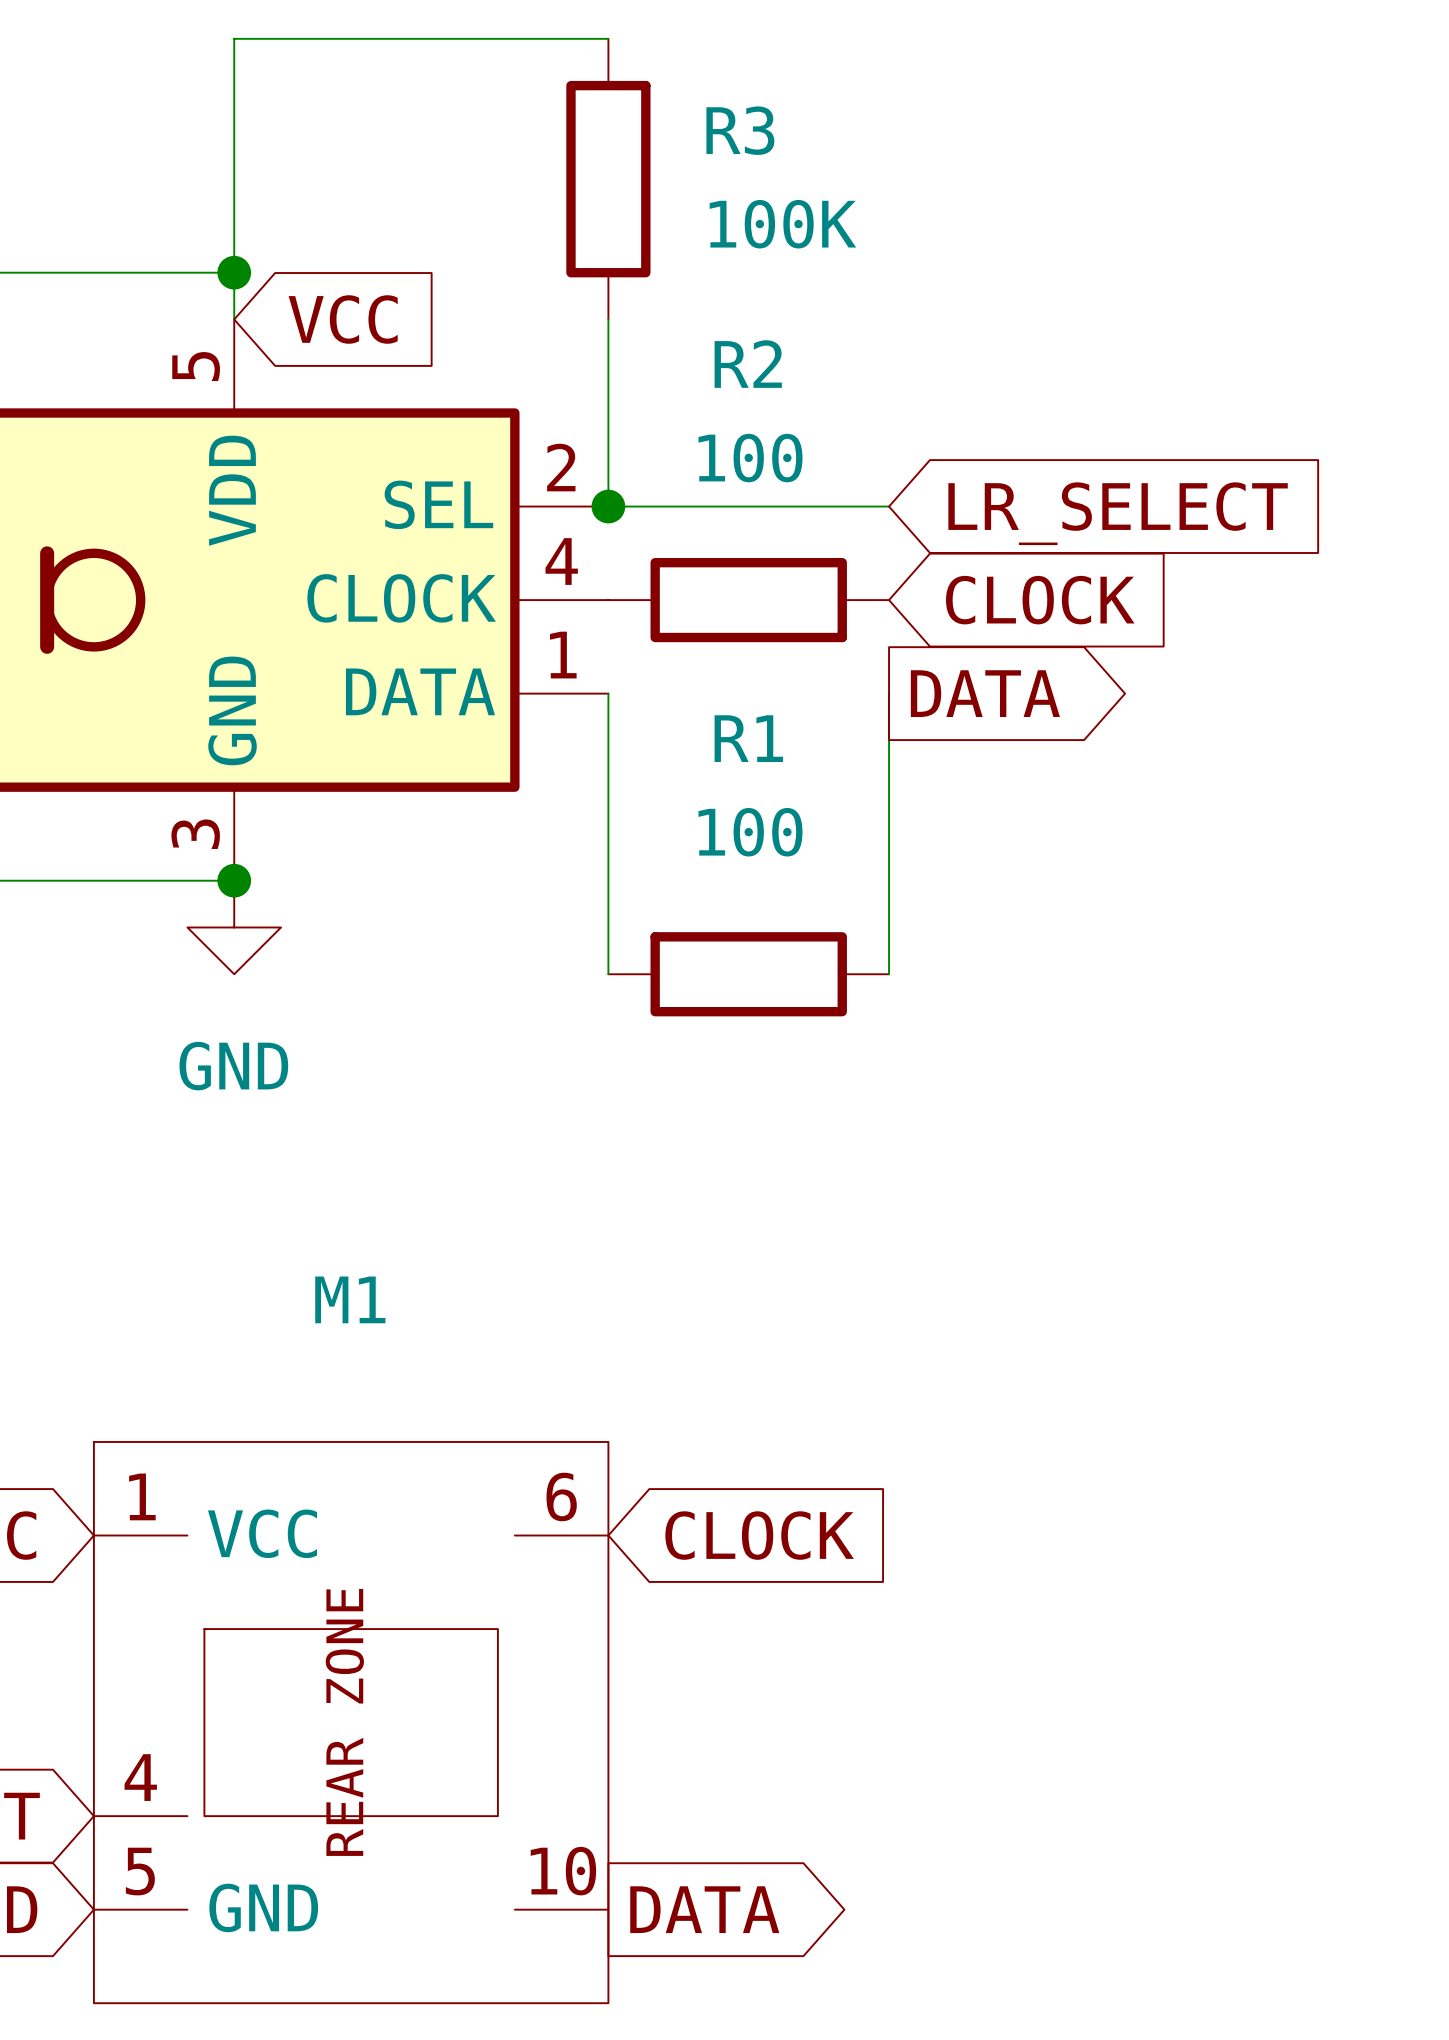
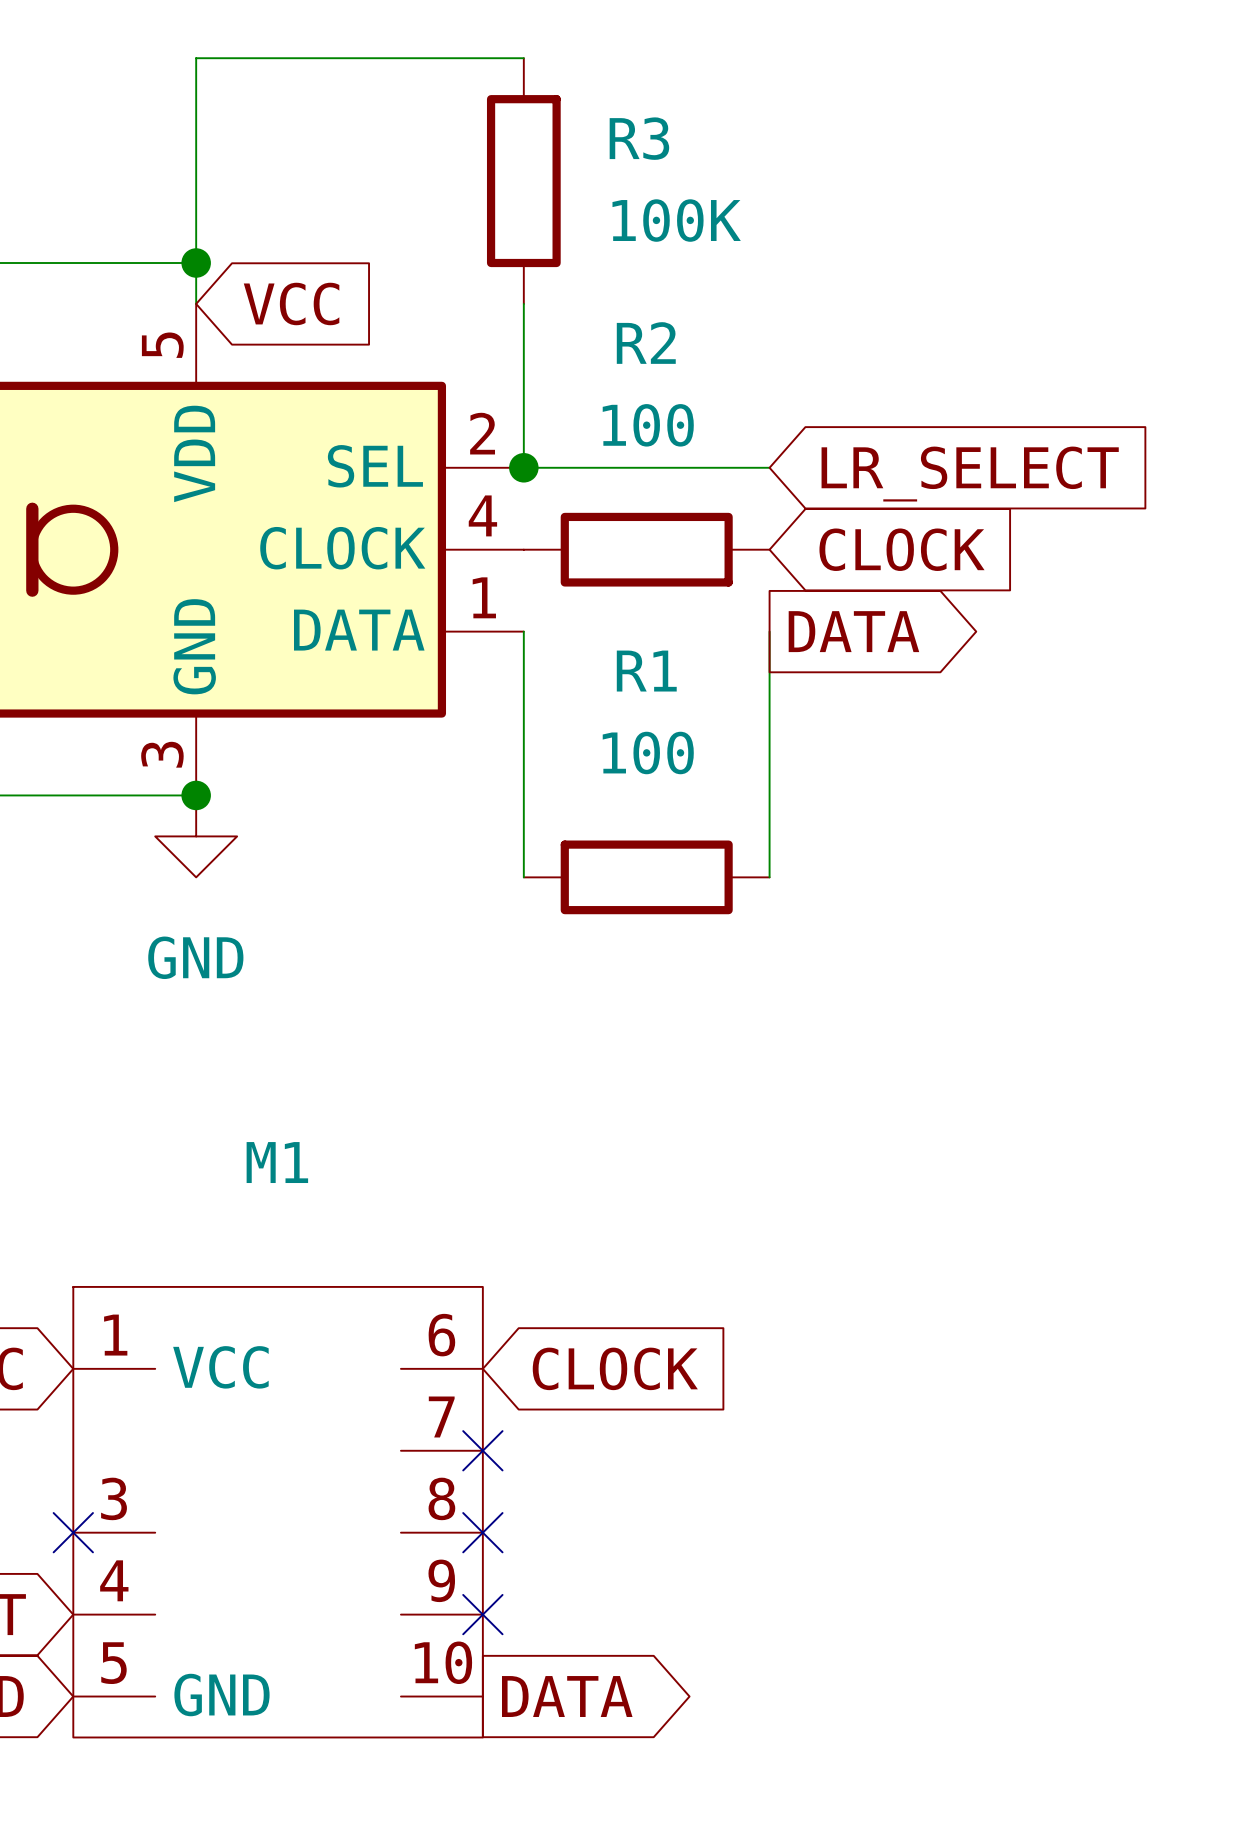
M1 symbol: [93, 1441, 609, 2004] -> [73, 1286, 483, 1738]
global label position: CLOCK (759, 1535) -> CLOCK (615, 1368)
no-connect mark: none -> (482, 1450)
no-connect mark: none -> (73, 1532)
no-connect mark: none -> (482, 1532)
no-connect mark: none -> (482, 1614)
global label position: DATA (704, 1909) -> DATA (567, 1696)

